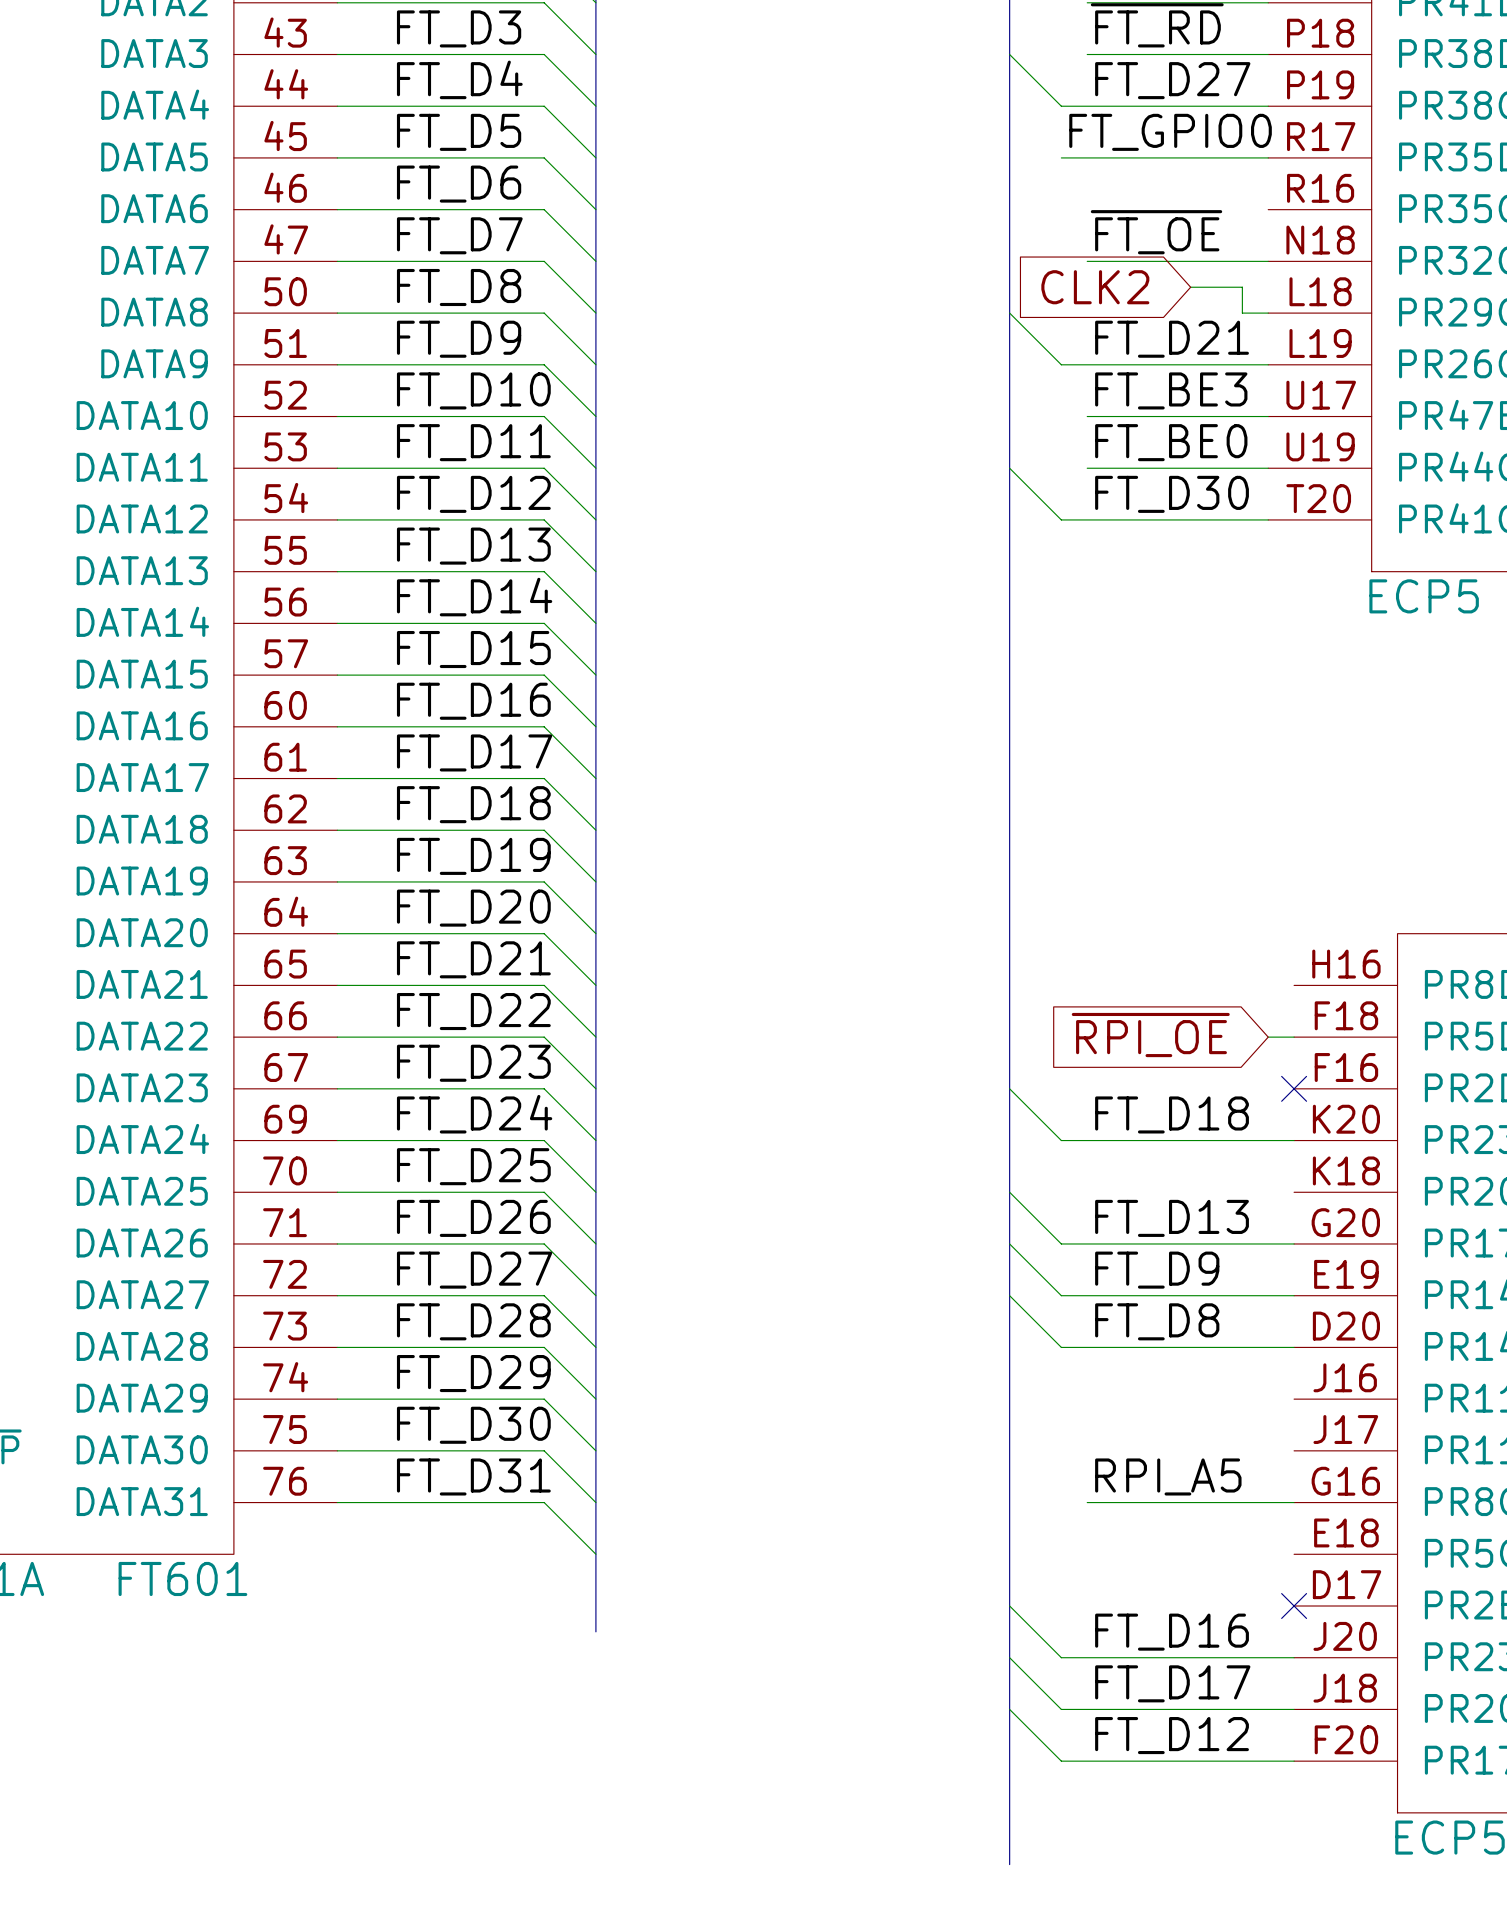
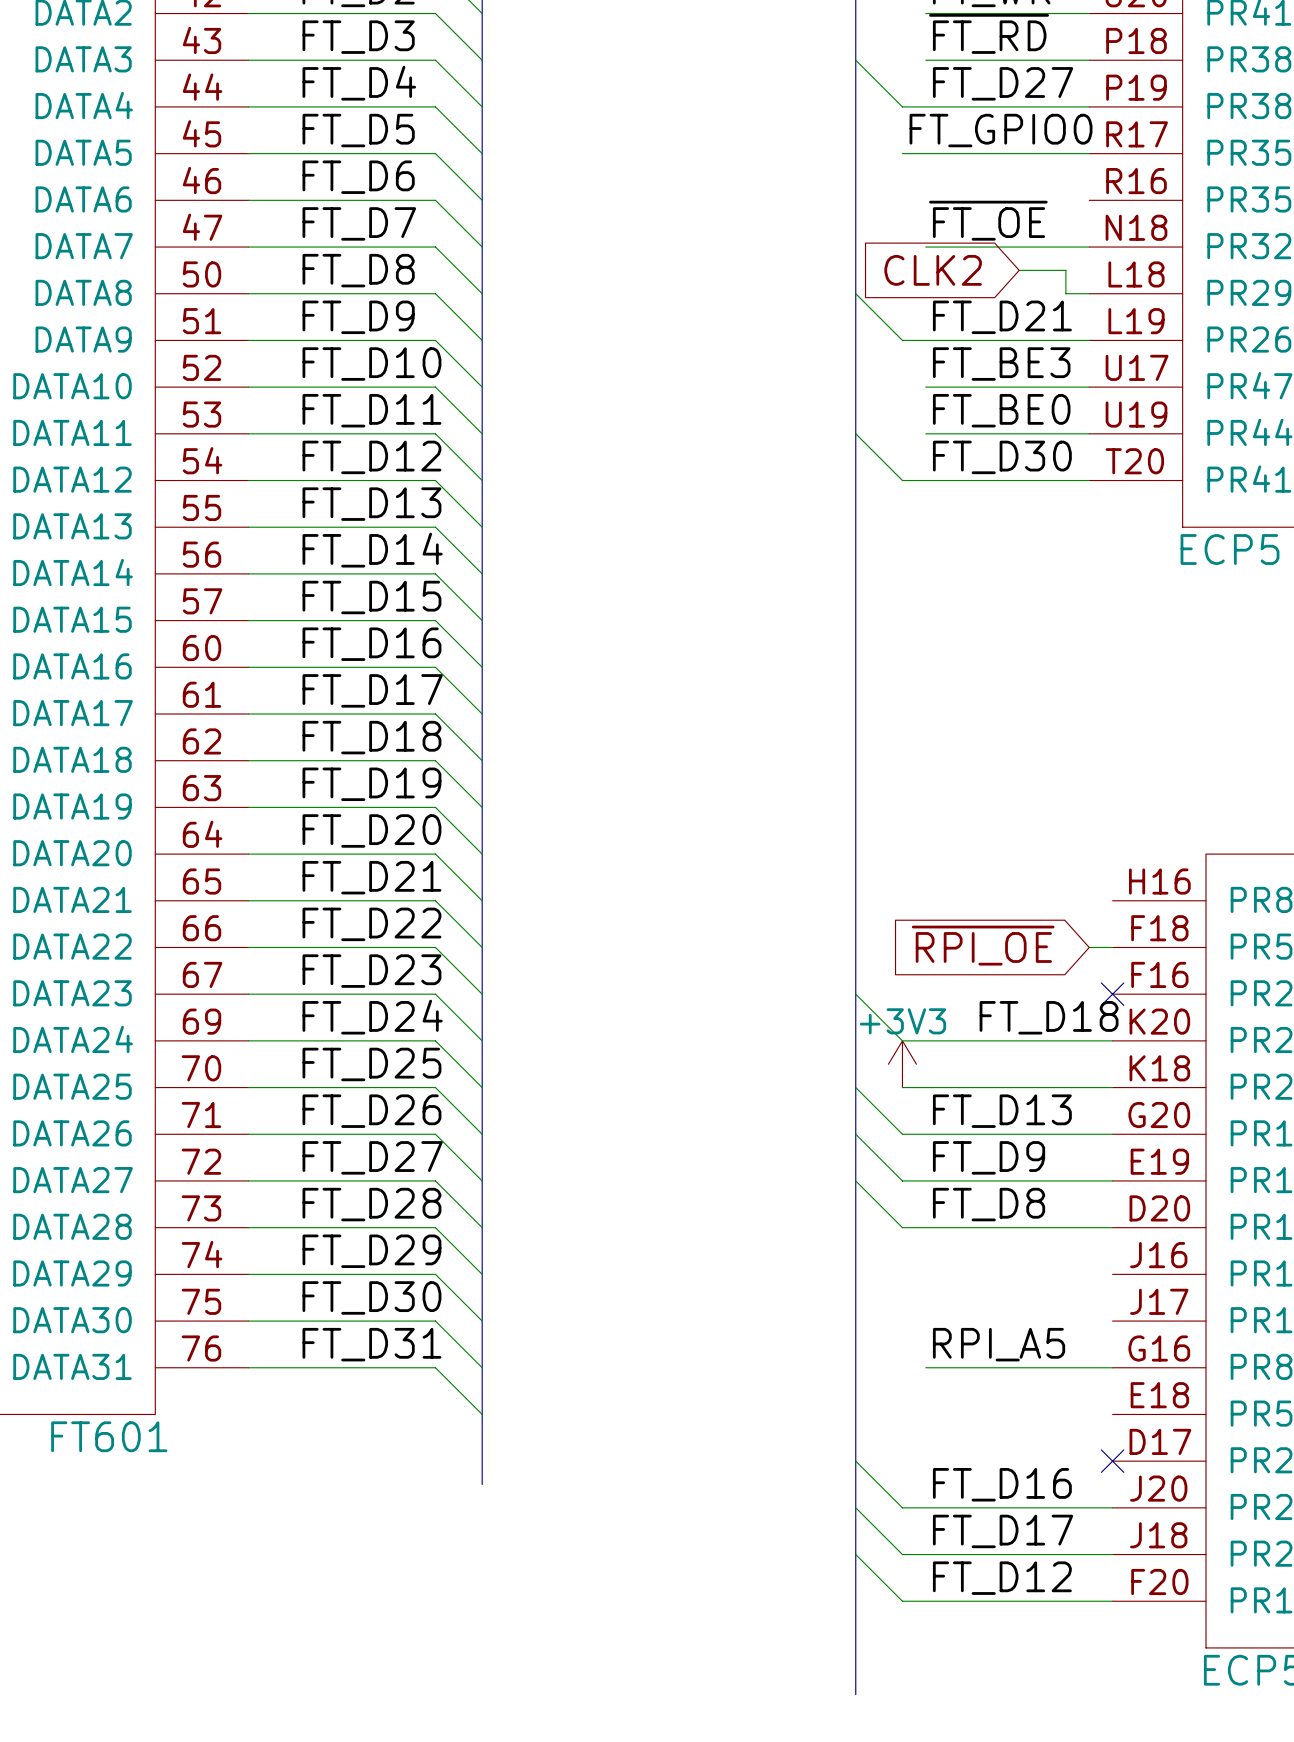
label position: FT_D18 (1172, 1114) -> FT_D18 (1049, 1017)
power symbol: none -> +3V3 (902, 1064)
wire: none -> (902, 1087) (1112, 1087)

